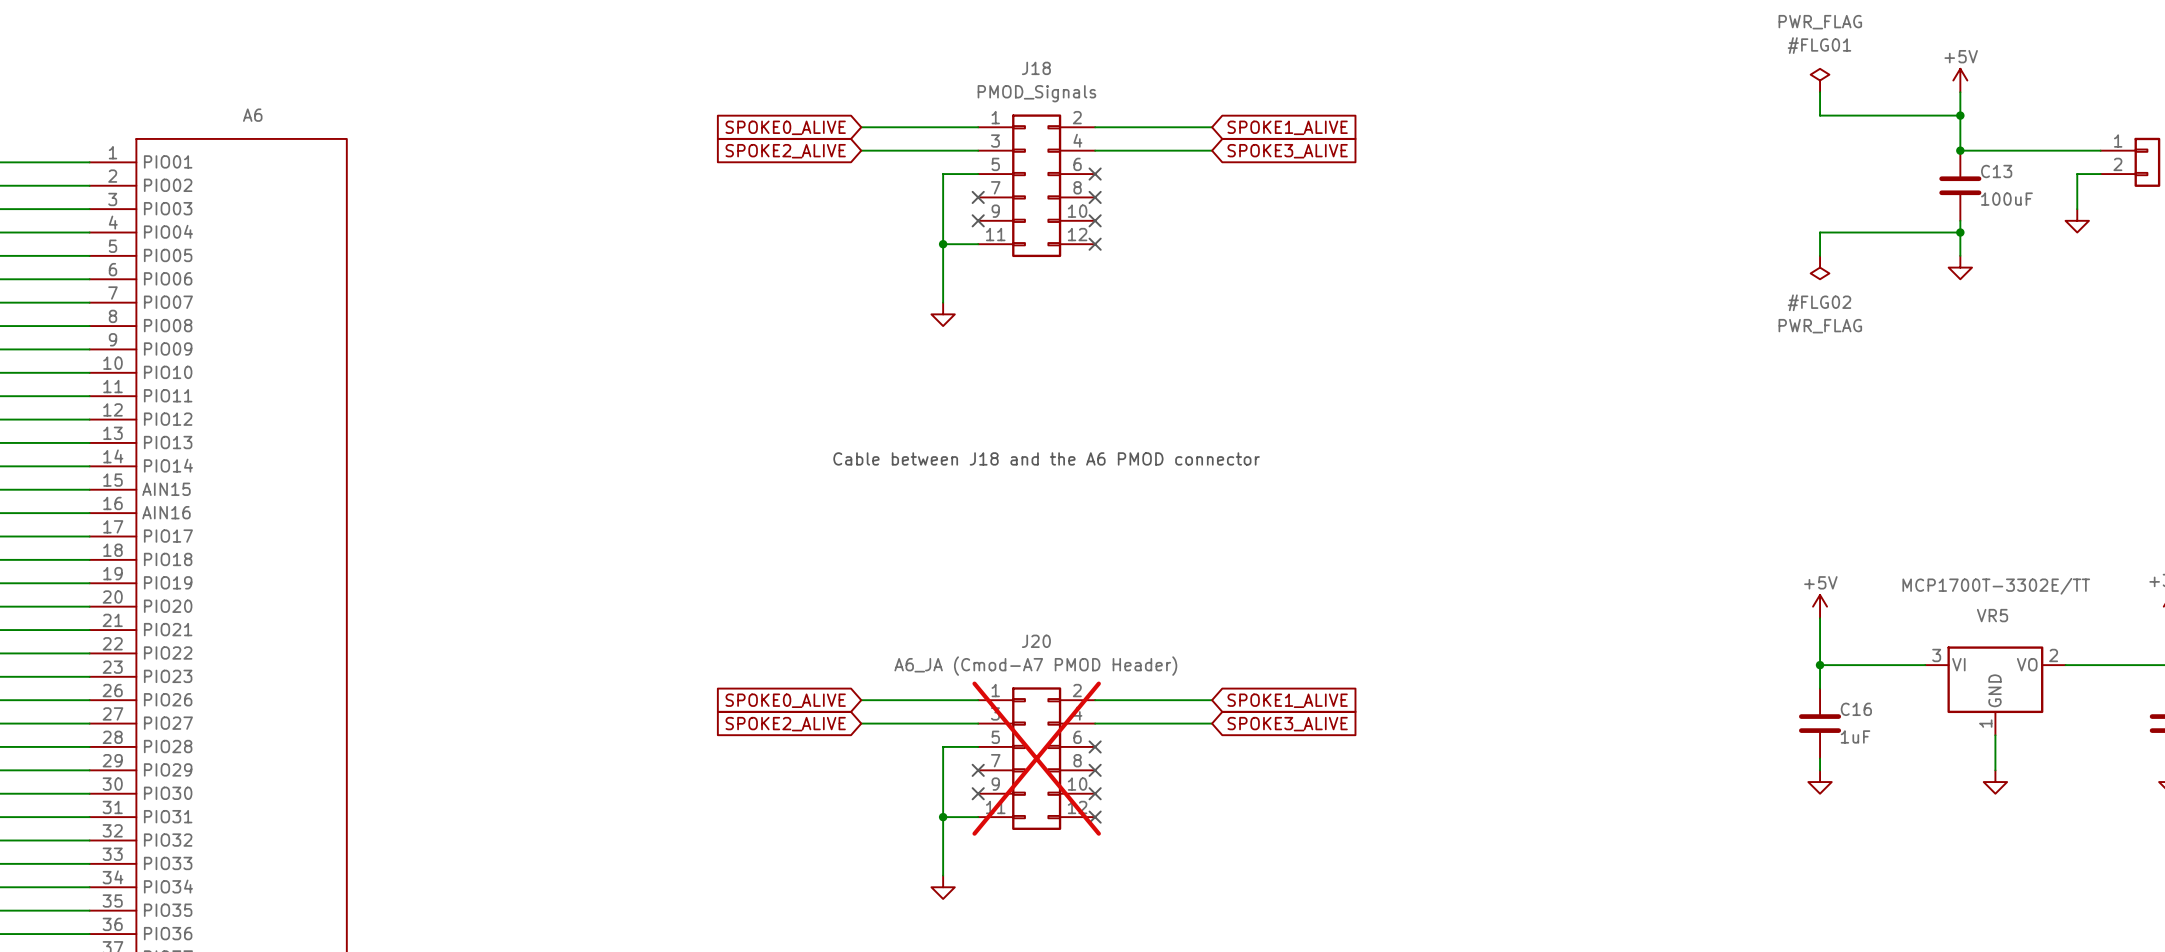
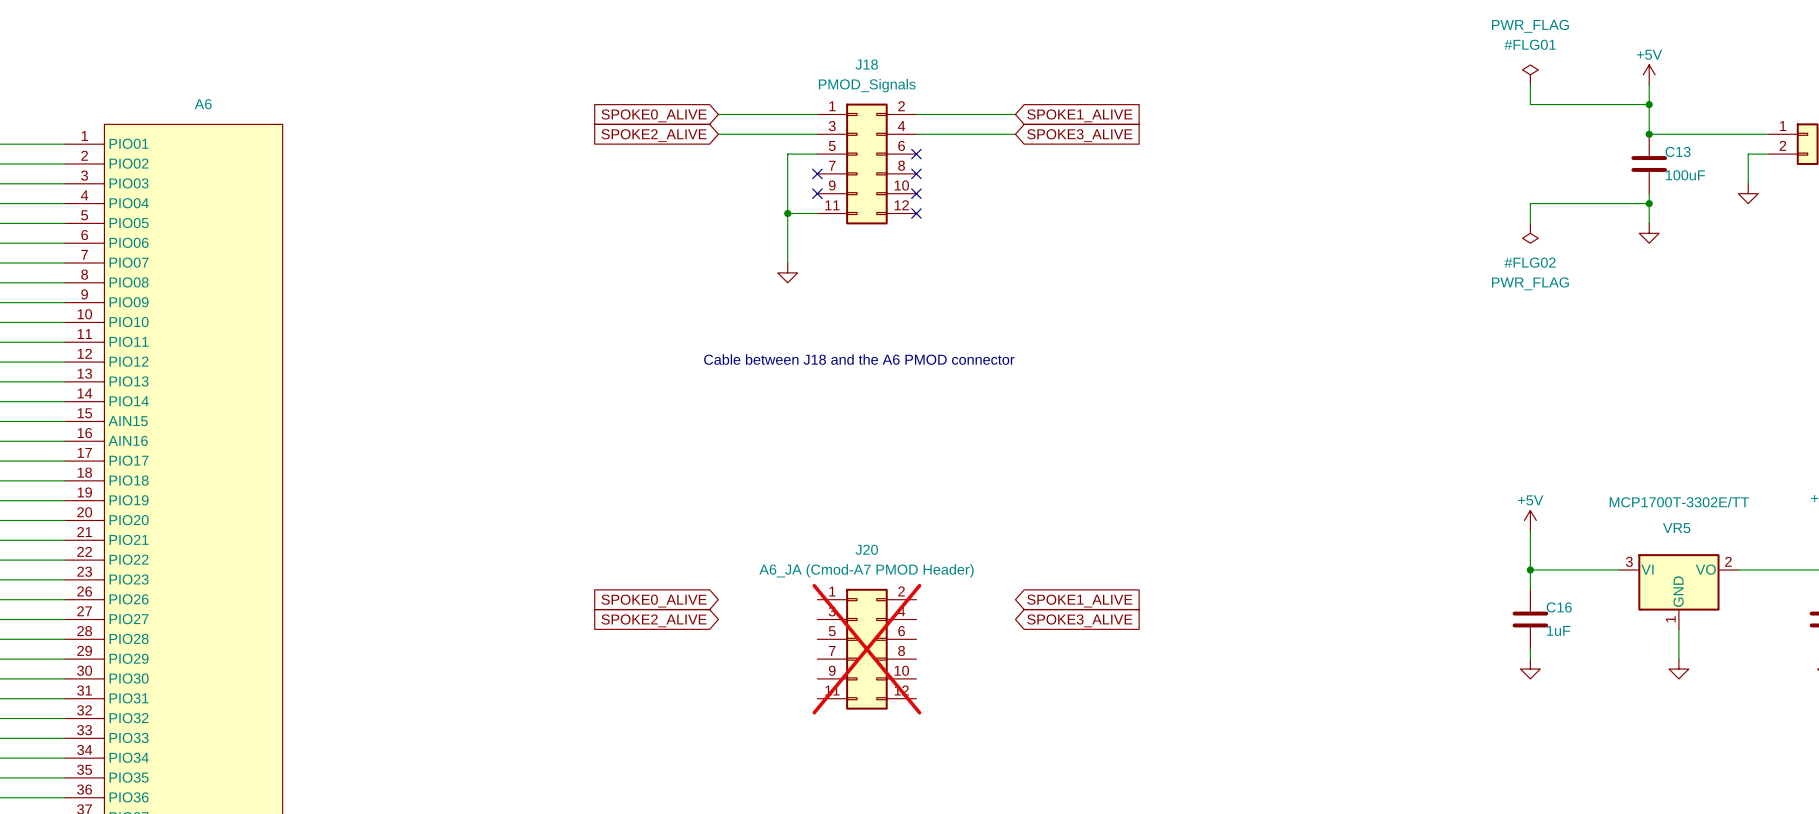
text position: Cable between J18 and the A6 PMOD connector (1046, 458) -> Cable between J18 and the A6 PMOD connector (859, 359)
wire: (861, 700) (978, 700) -> none
wire: (1095, 700) (1212, 700) -> none
wire: (861, 723) (978, 723) -> none
wire: (1095, 723) (1212, 723) -> none
wire: (978, 746) (943, 746) (943, 875) -> none
no-connect mark: (1095, 746) -> none
no-connect mark: (978, 770) -> none
no-connect mark: (1095, 770) -> none
no-connect mark: (978, 793) -> none
no-connect mark: (1095, 793) -> none
wire: (943, 817) (978, 817) -> none
junction: (943, 817) -> none
no-connect mark: (1095, 817) -> none
power symbol: (943, 887) -> none

